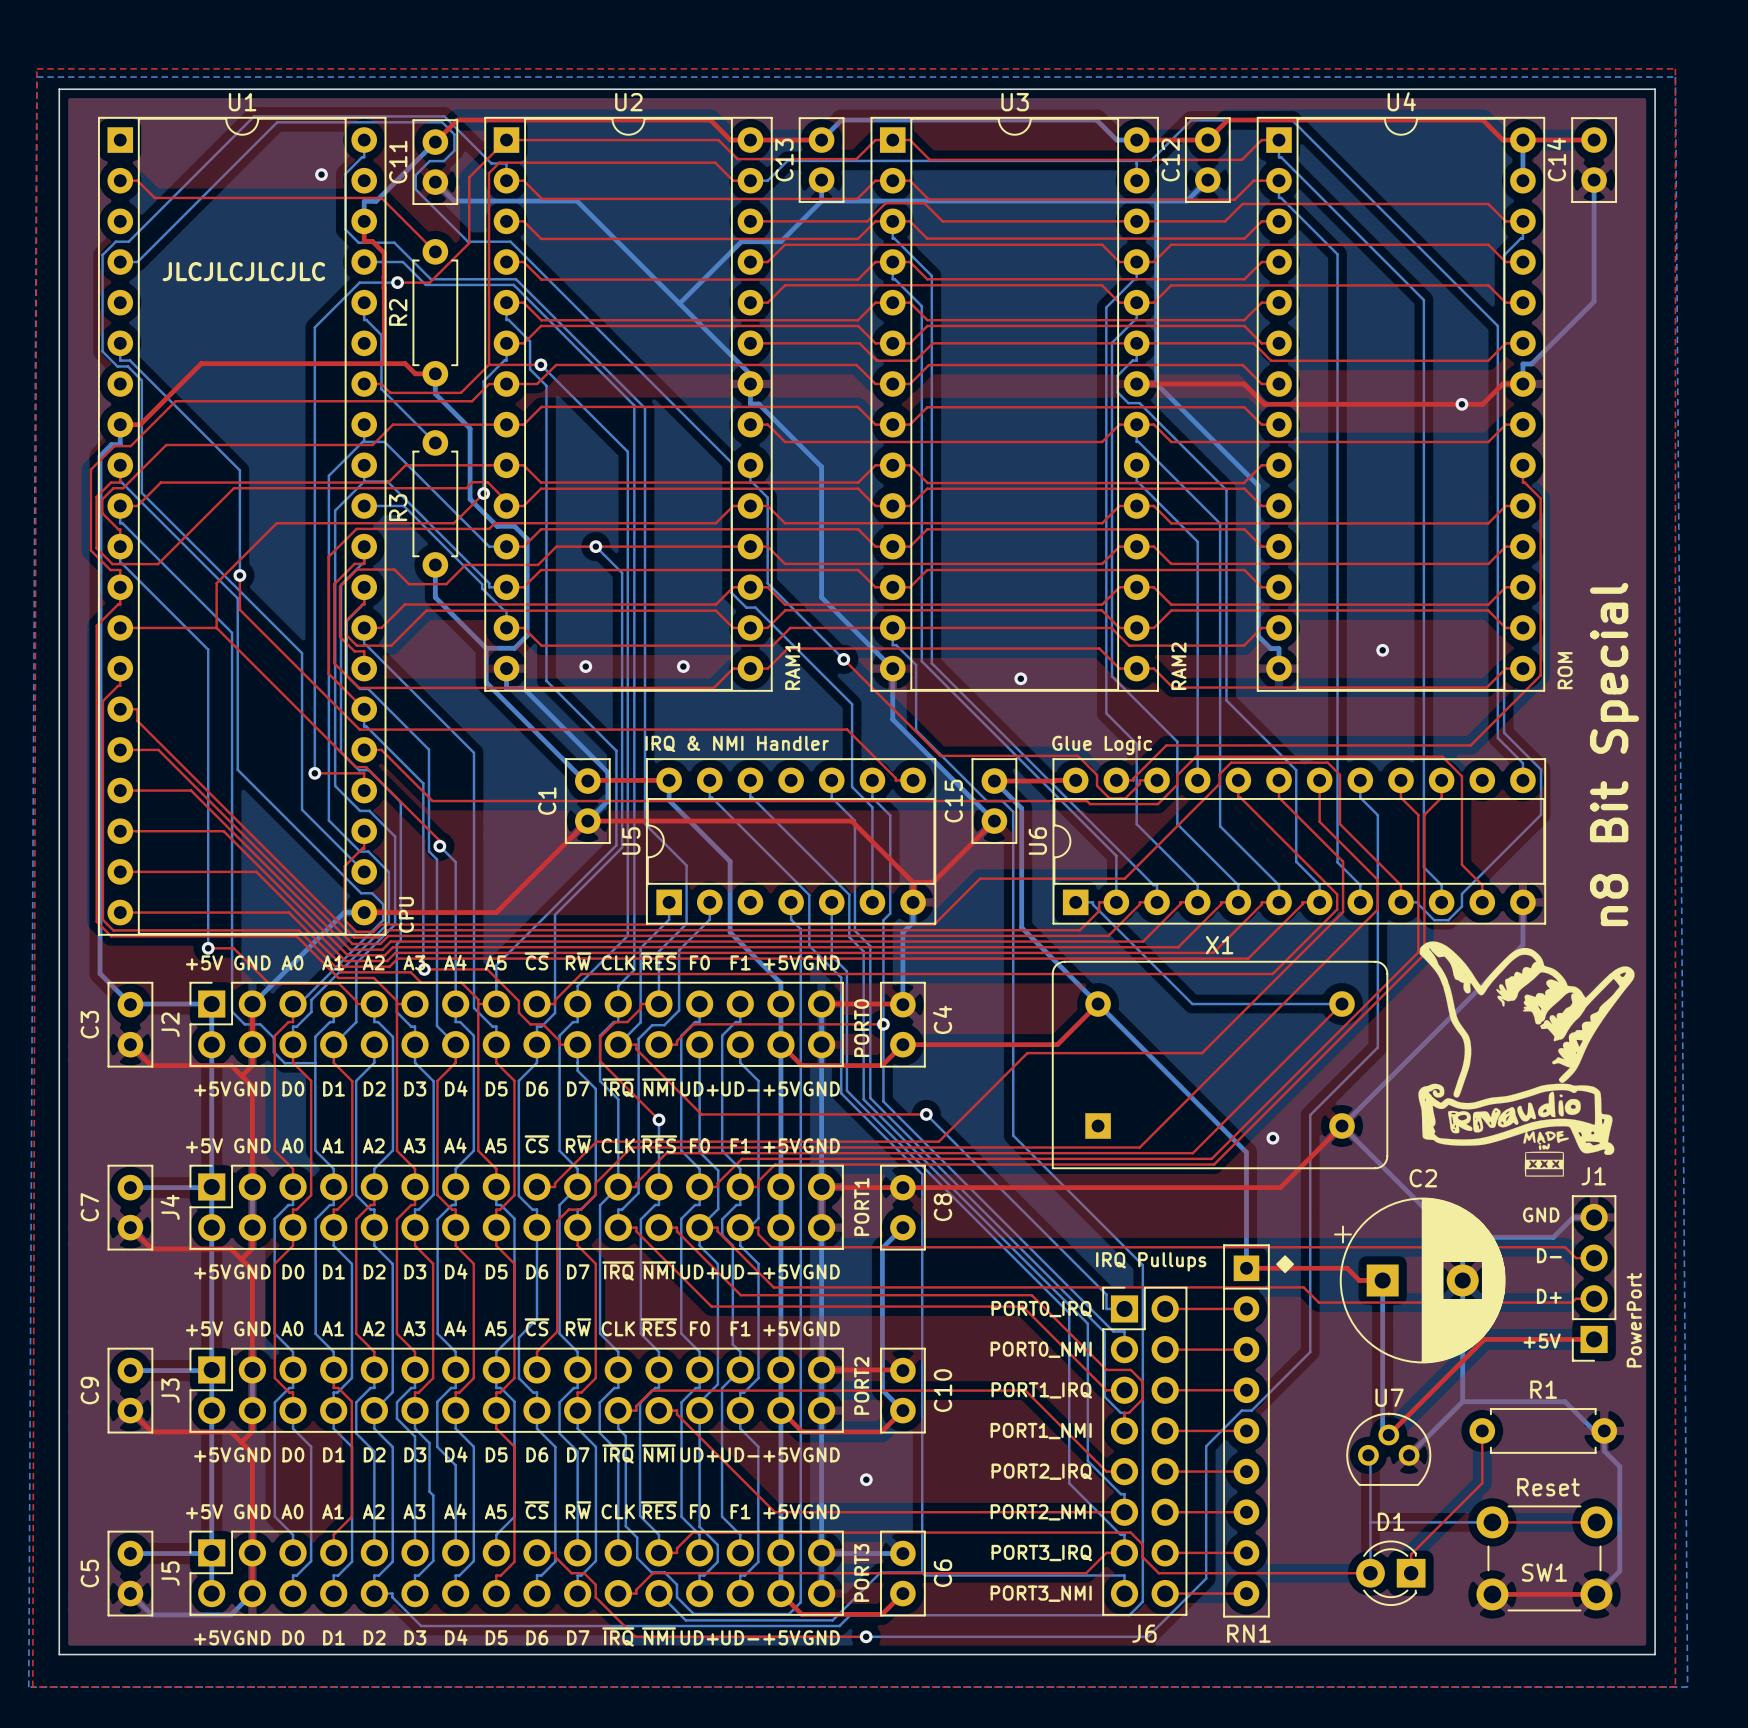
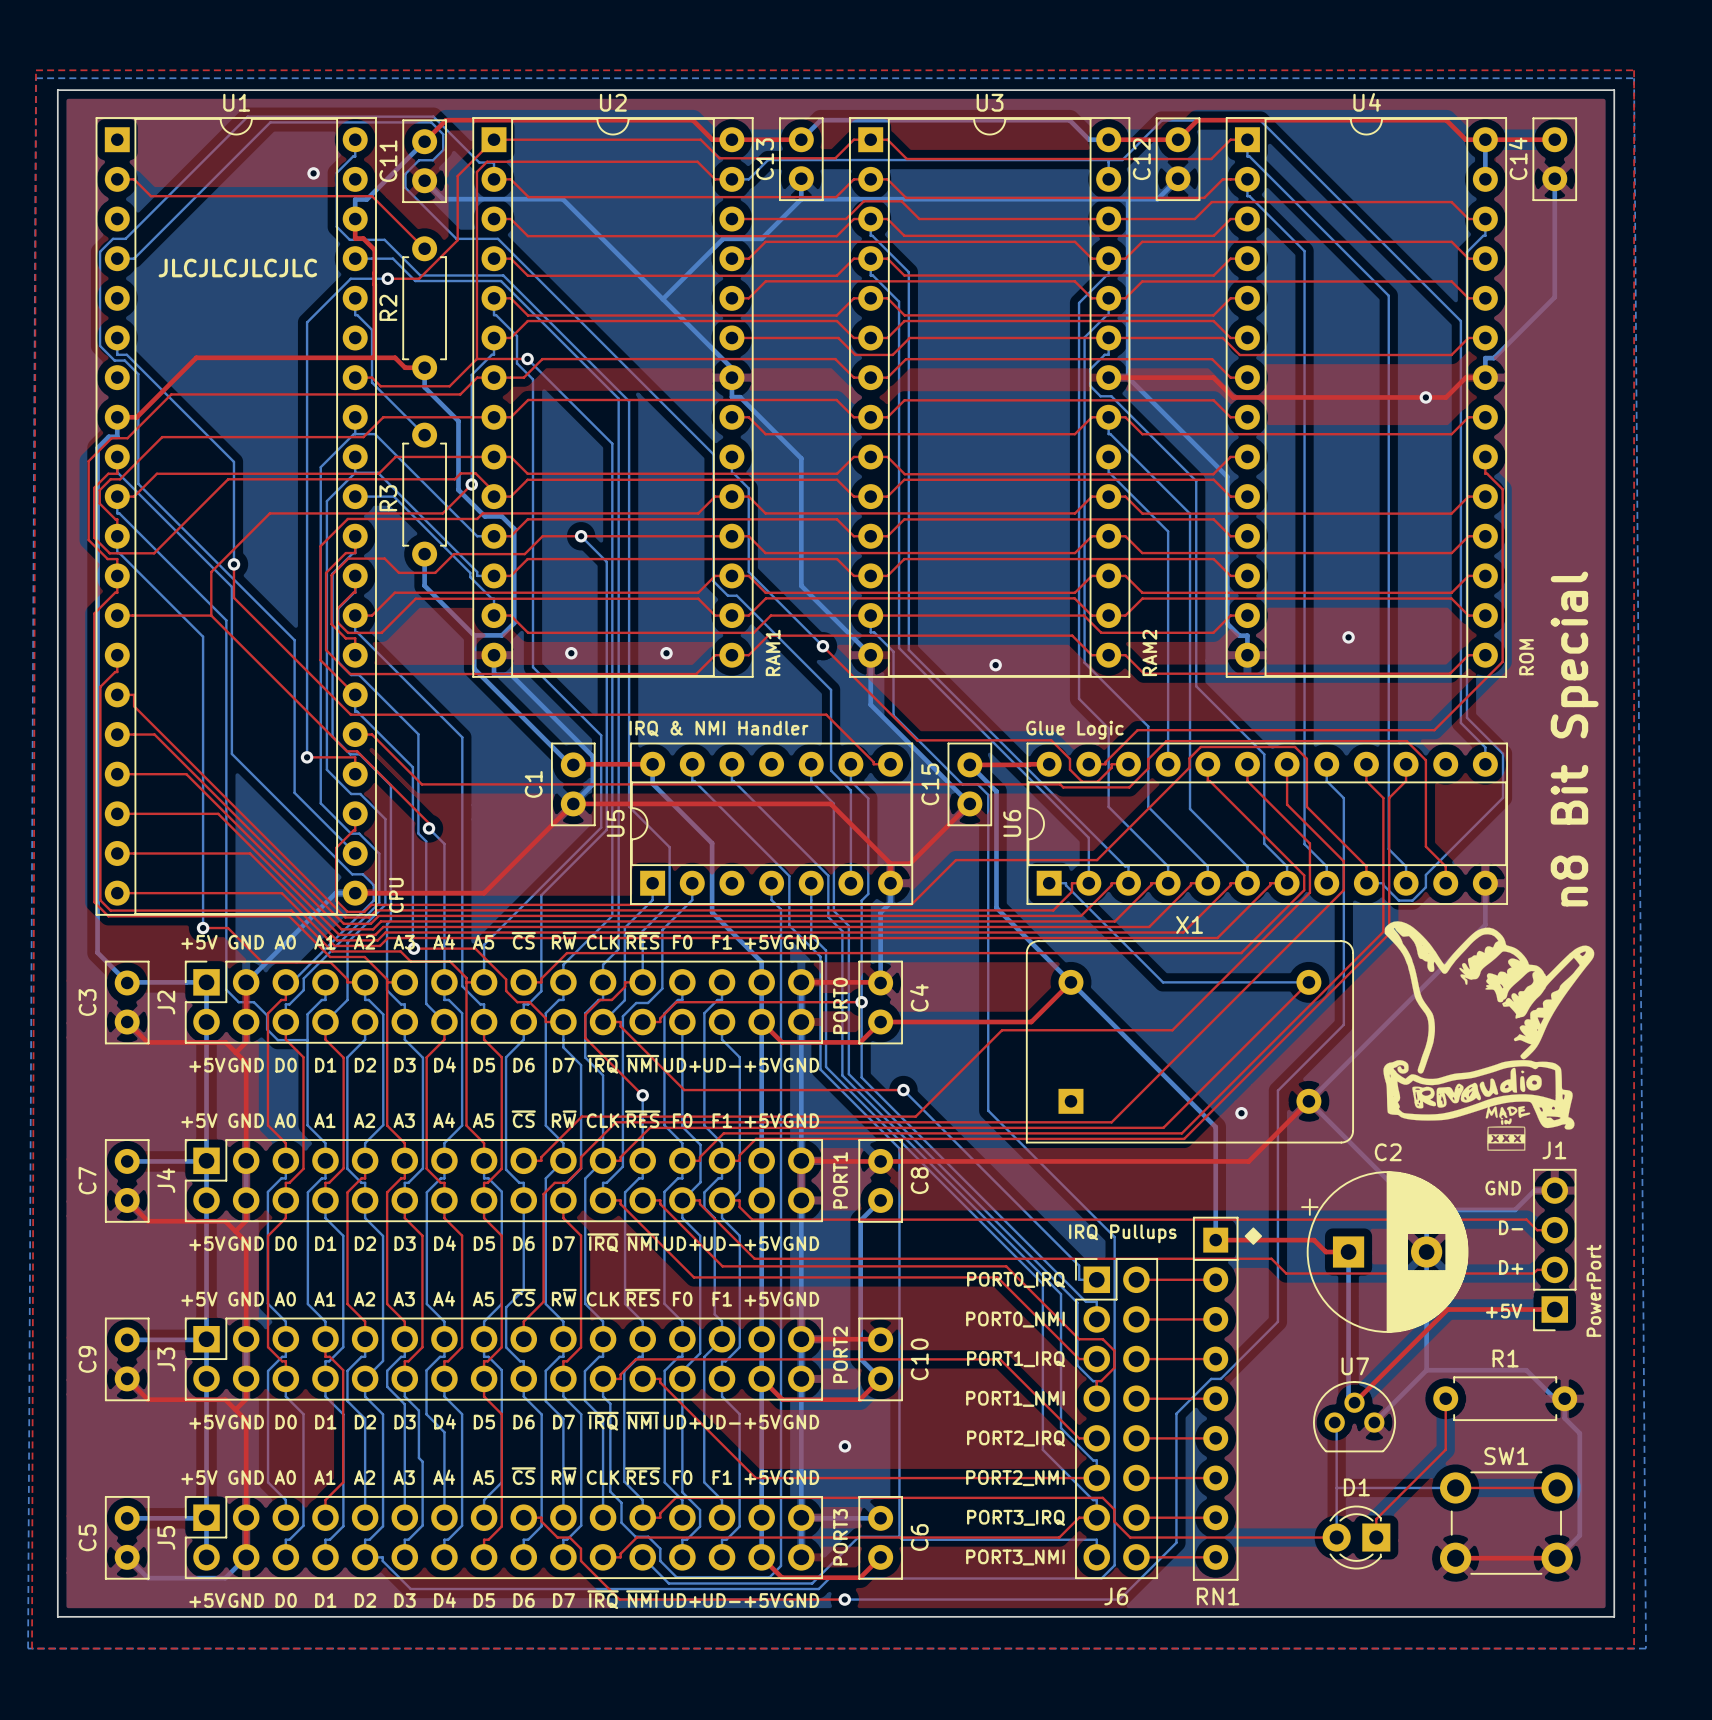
text: Reset (1548, 1487) -> none
SW1 name position: SW1 (1544, 1572) -> SW1 (1506, 1456)

